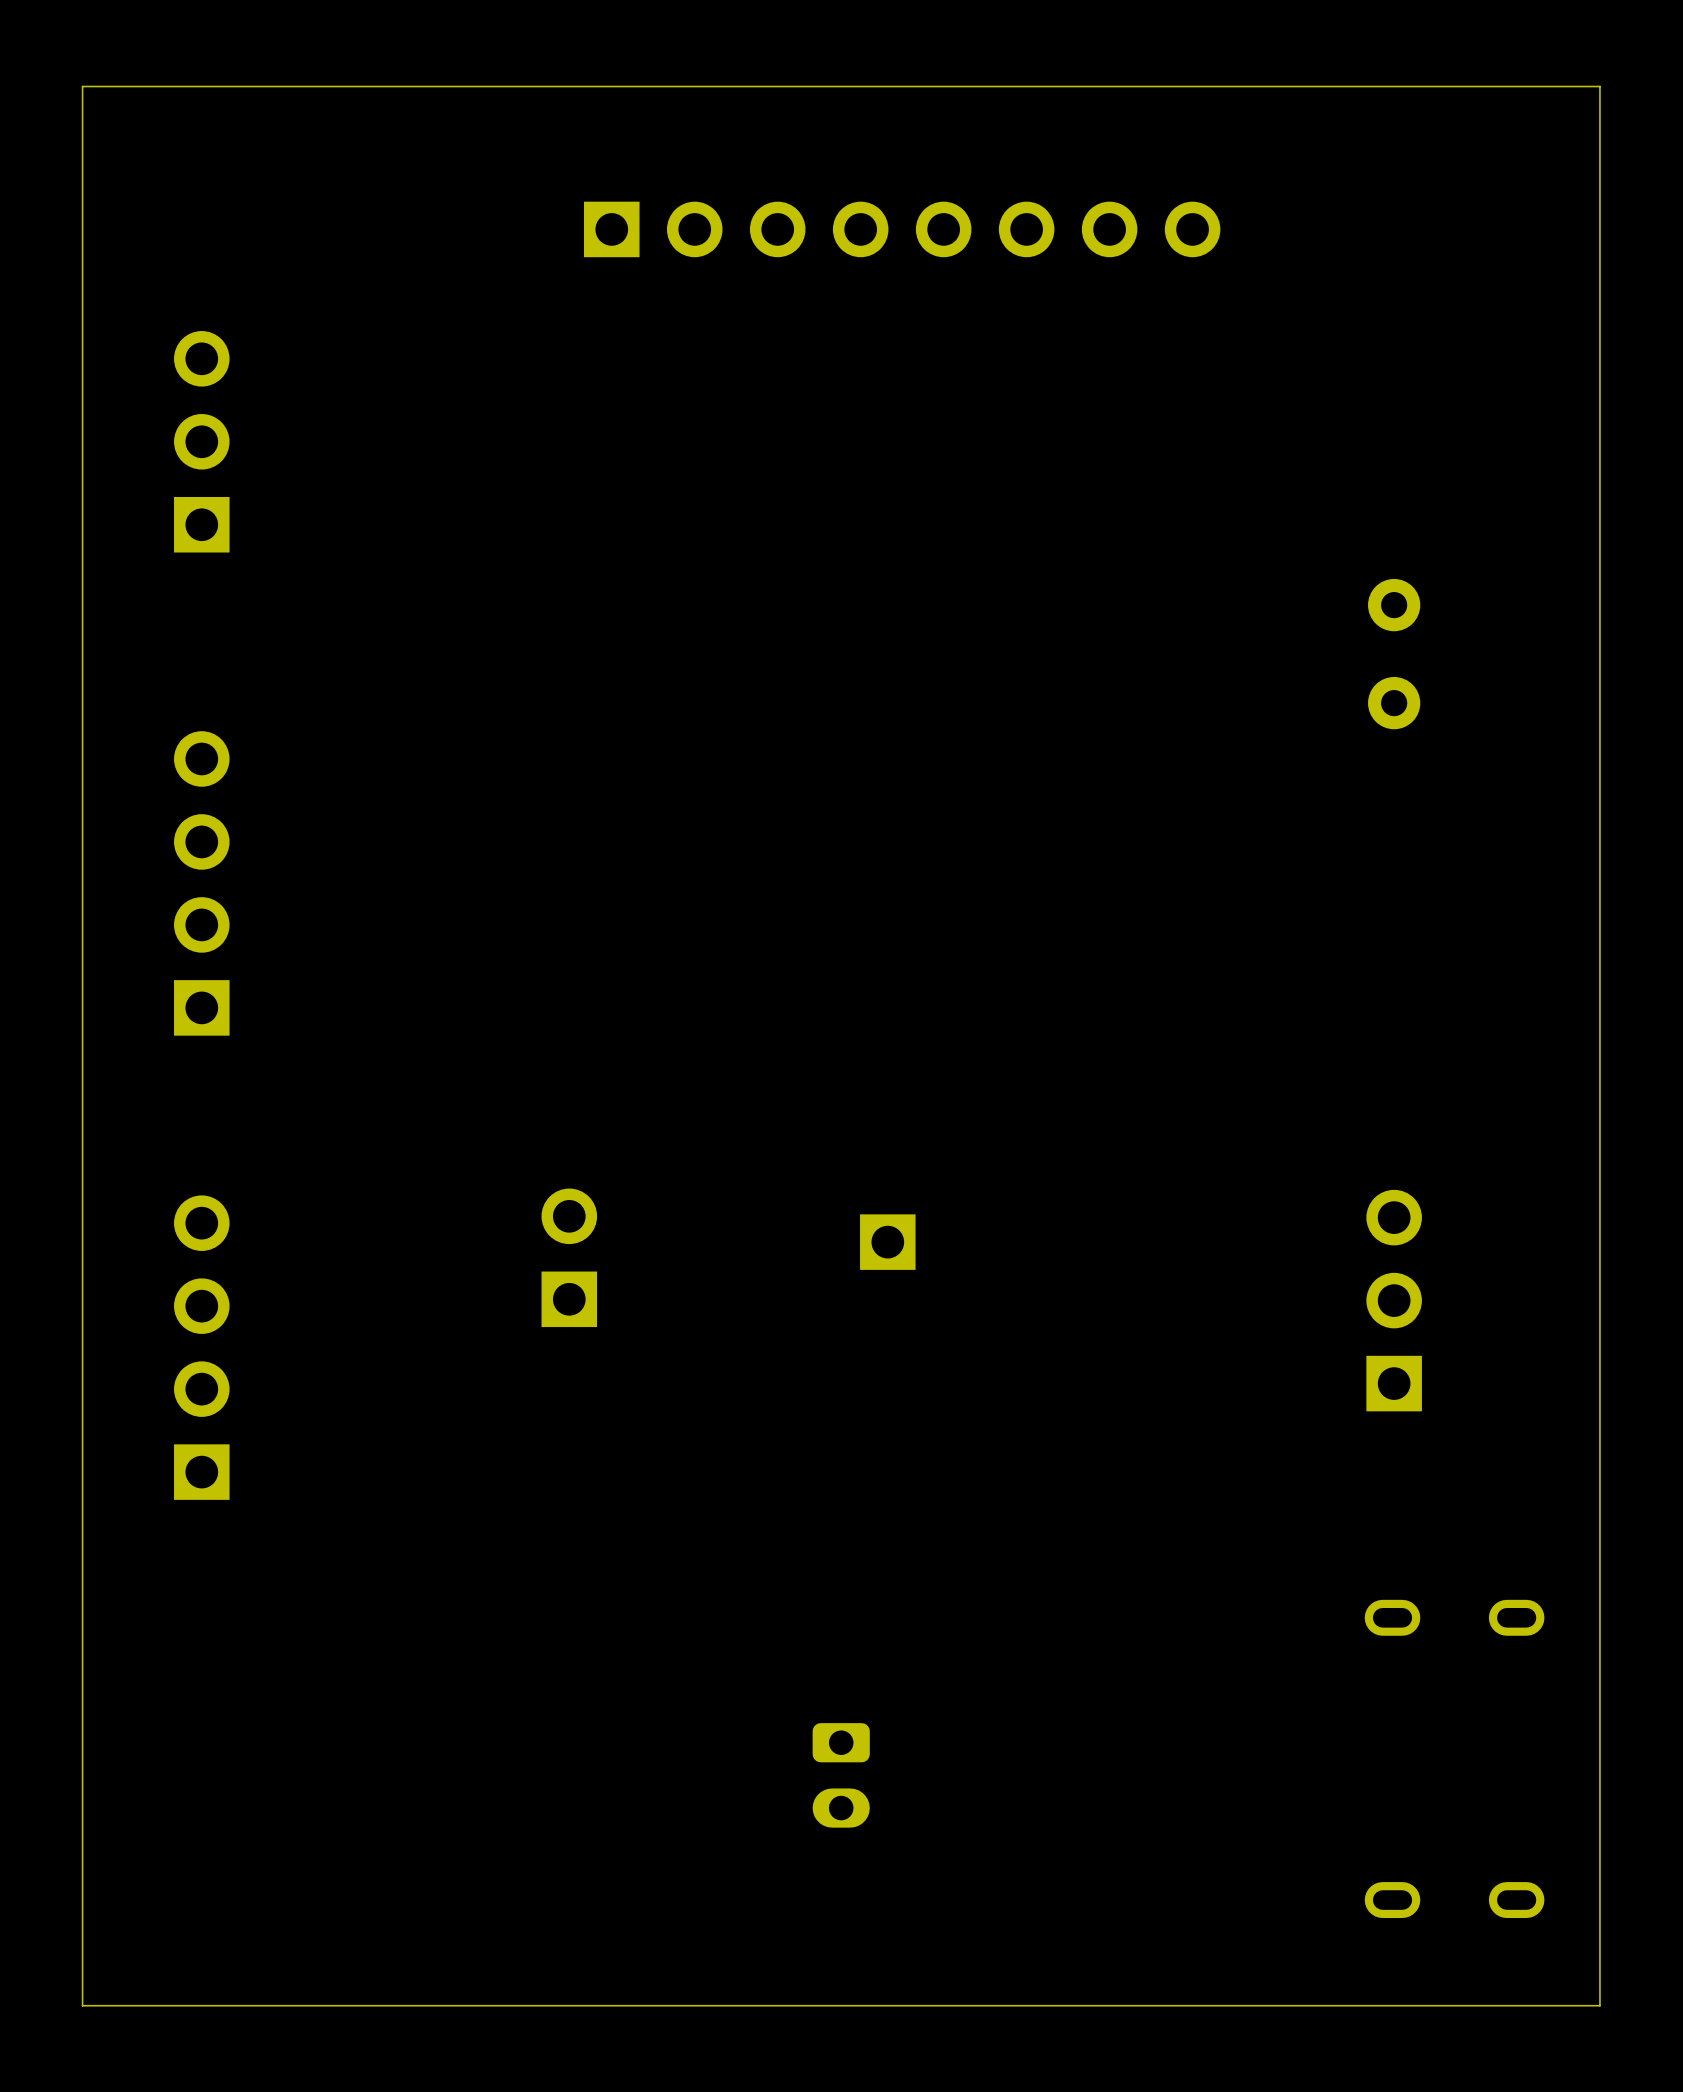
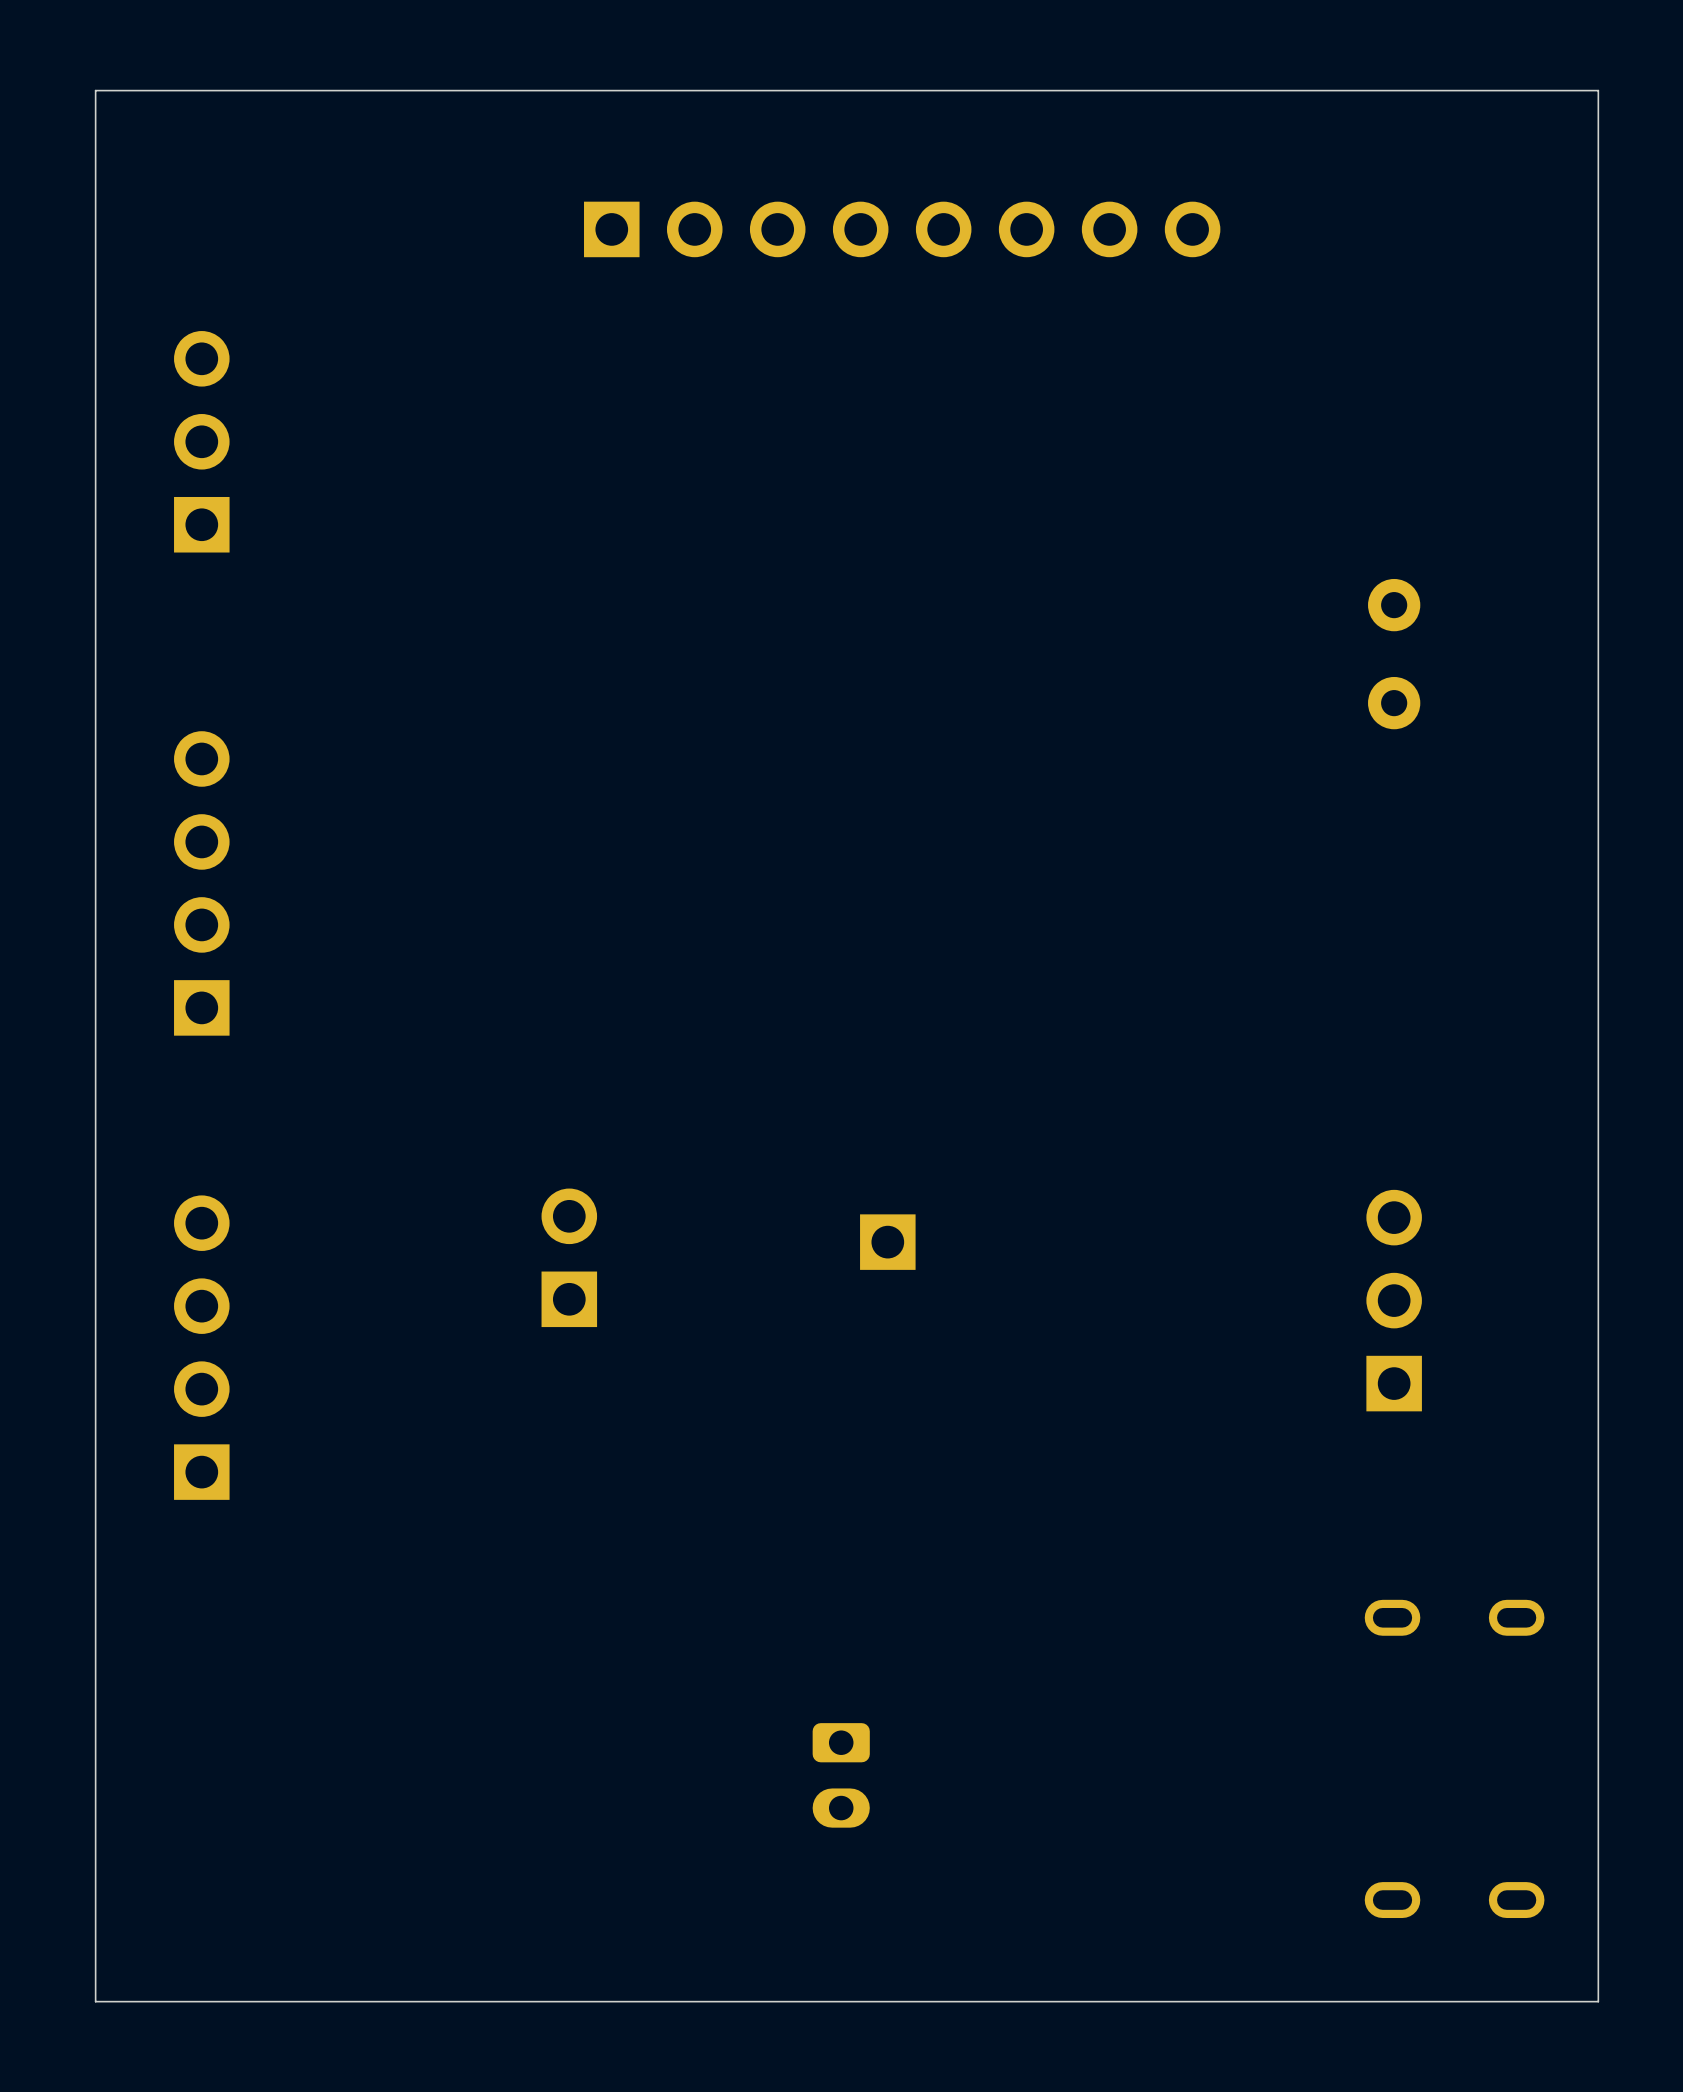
board edge: (1599, 86) (82, 86) (82, 2005) (1599, 2005) (1599, 86) -> (1598, 90) (1598, 2001) (95, 2001) (95, 90) (1598, 90)

